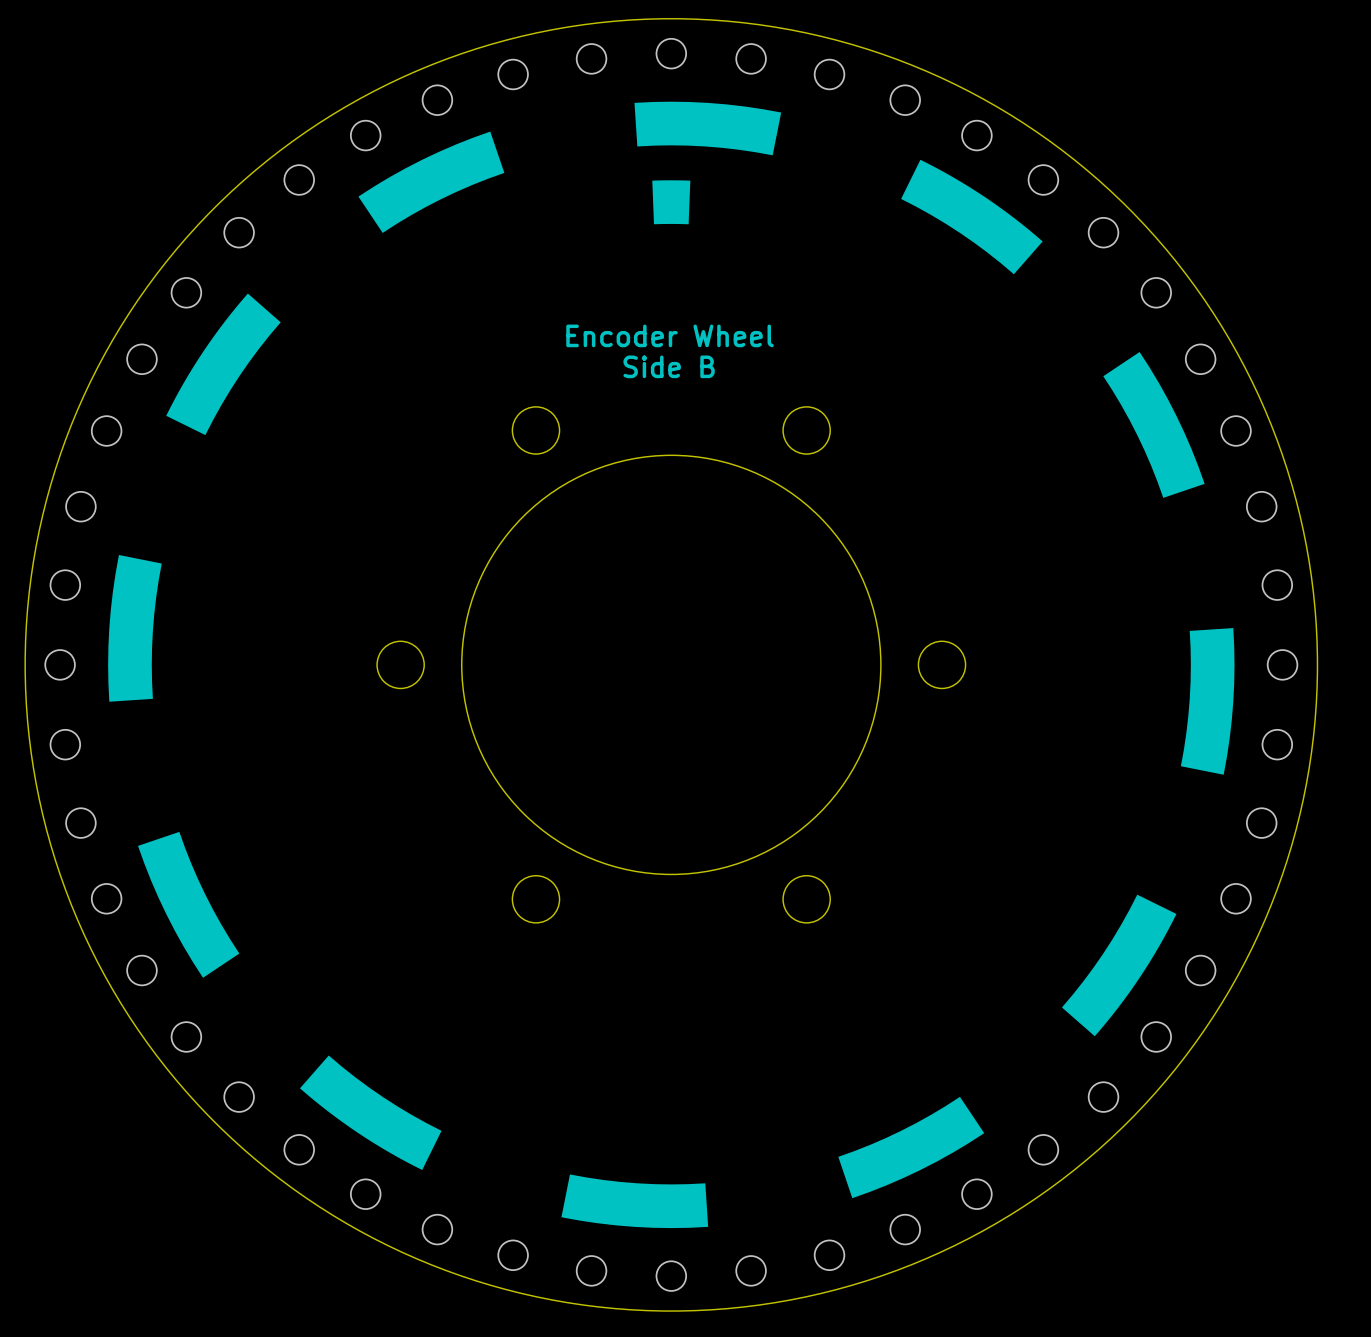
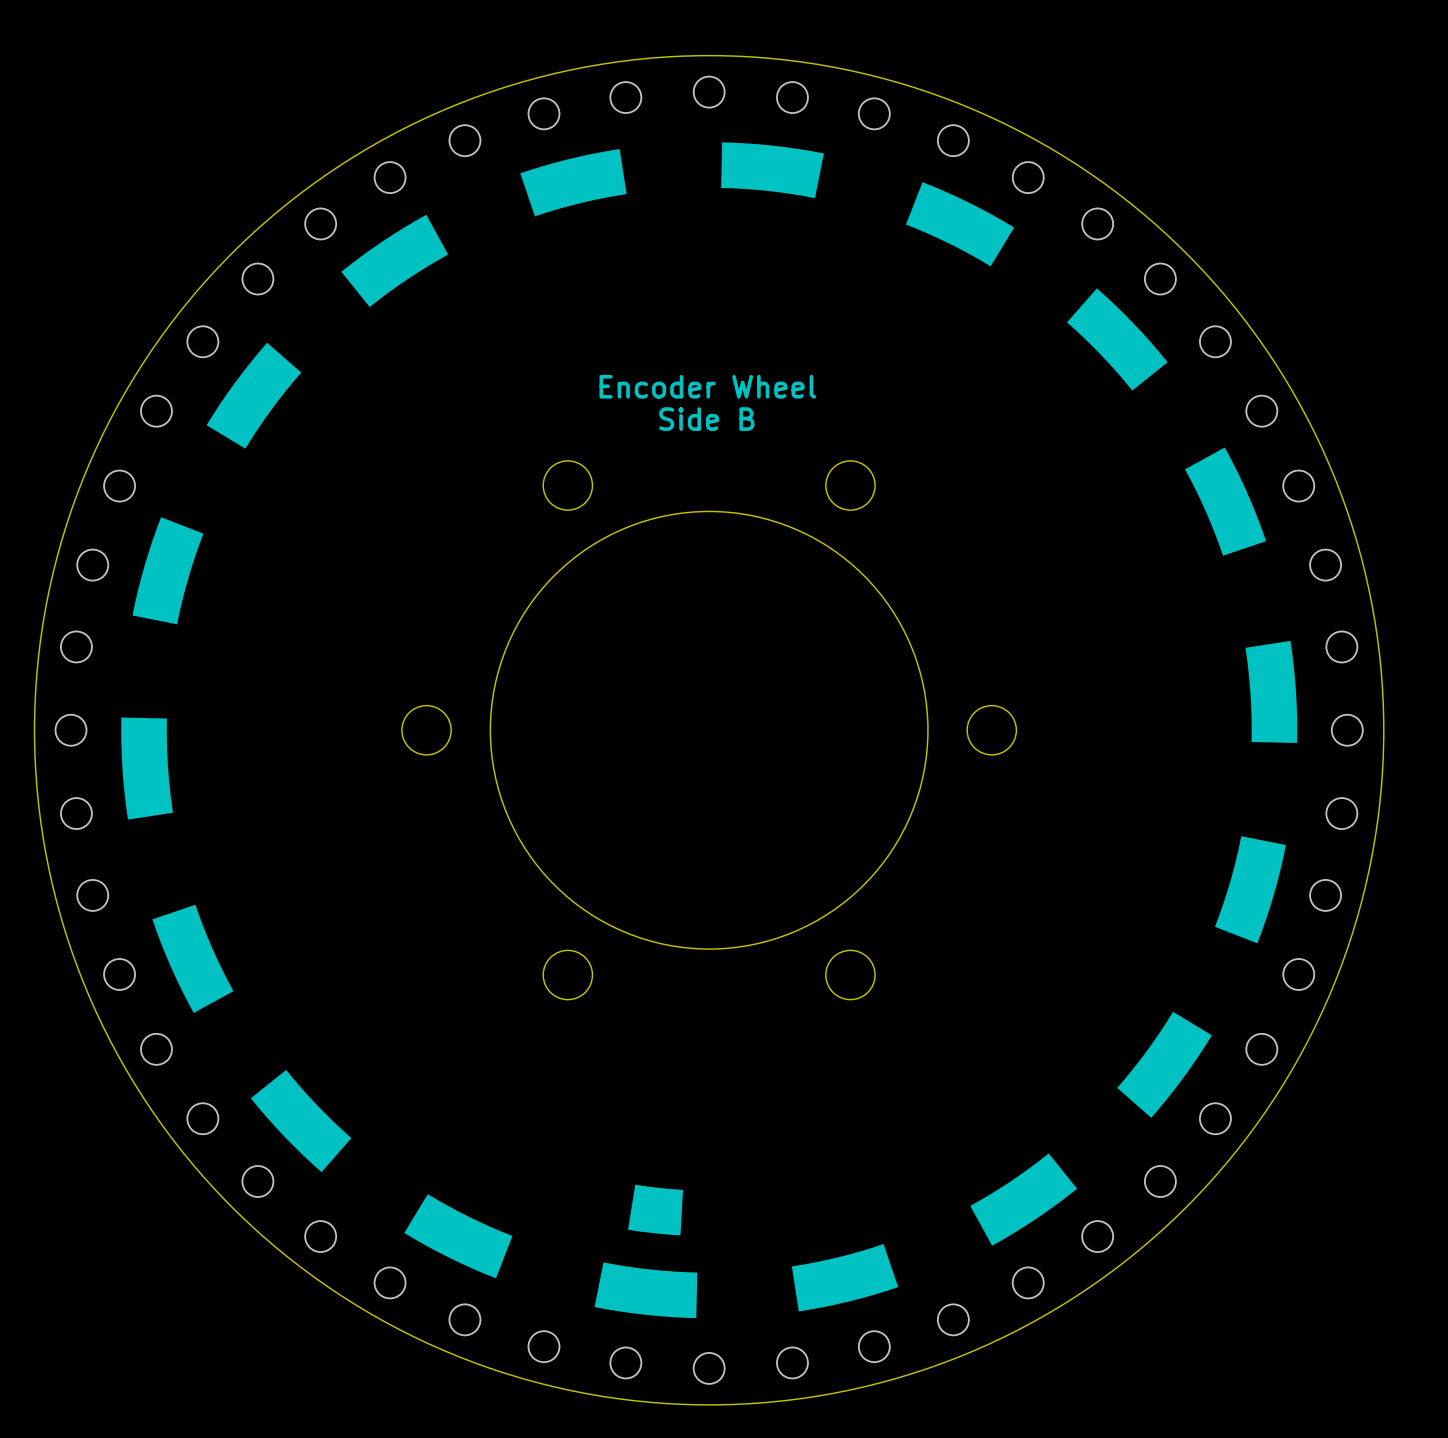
drawing shape: [108, 101, 1235, 1229] -> [121, 142, 1298, 1319]

